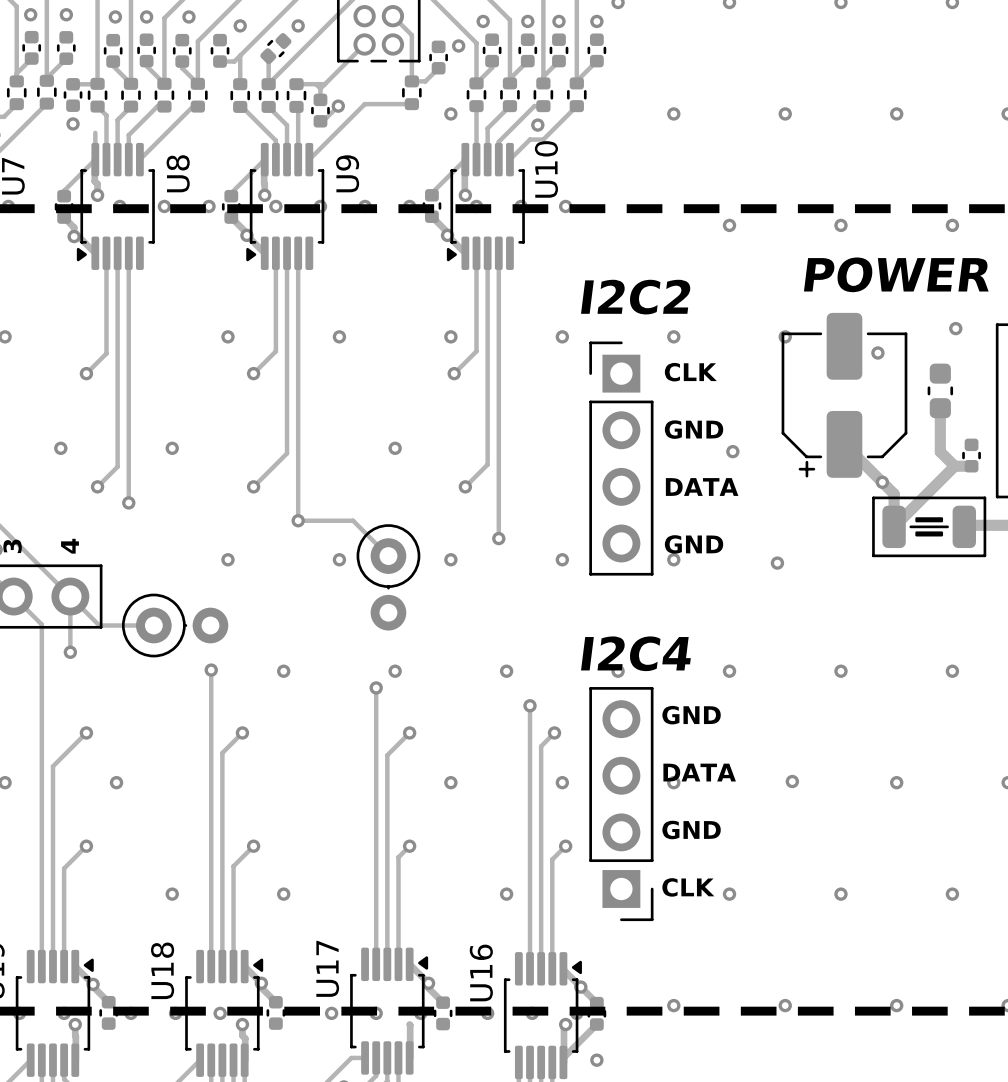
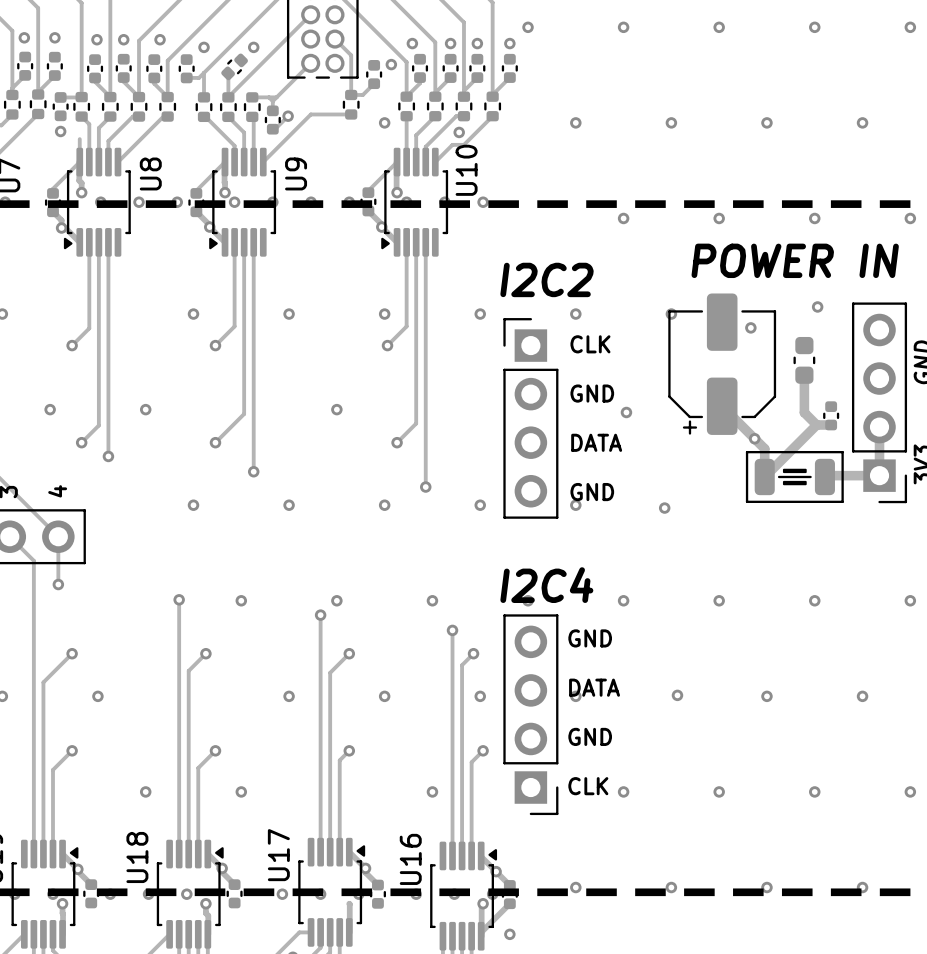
track: (298, 520) (353, 520) (388, 556) -> none
part: (388, 577) -> none
track: (70, 596) (99, 625) (153, 625) -> none
part: (175, 625) -> none
via: none -> (289, 696)

